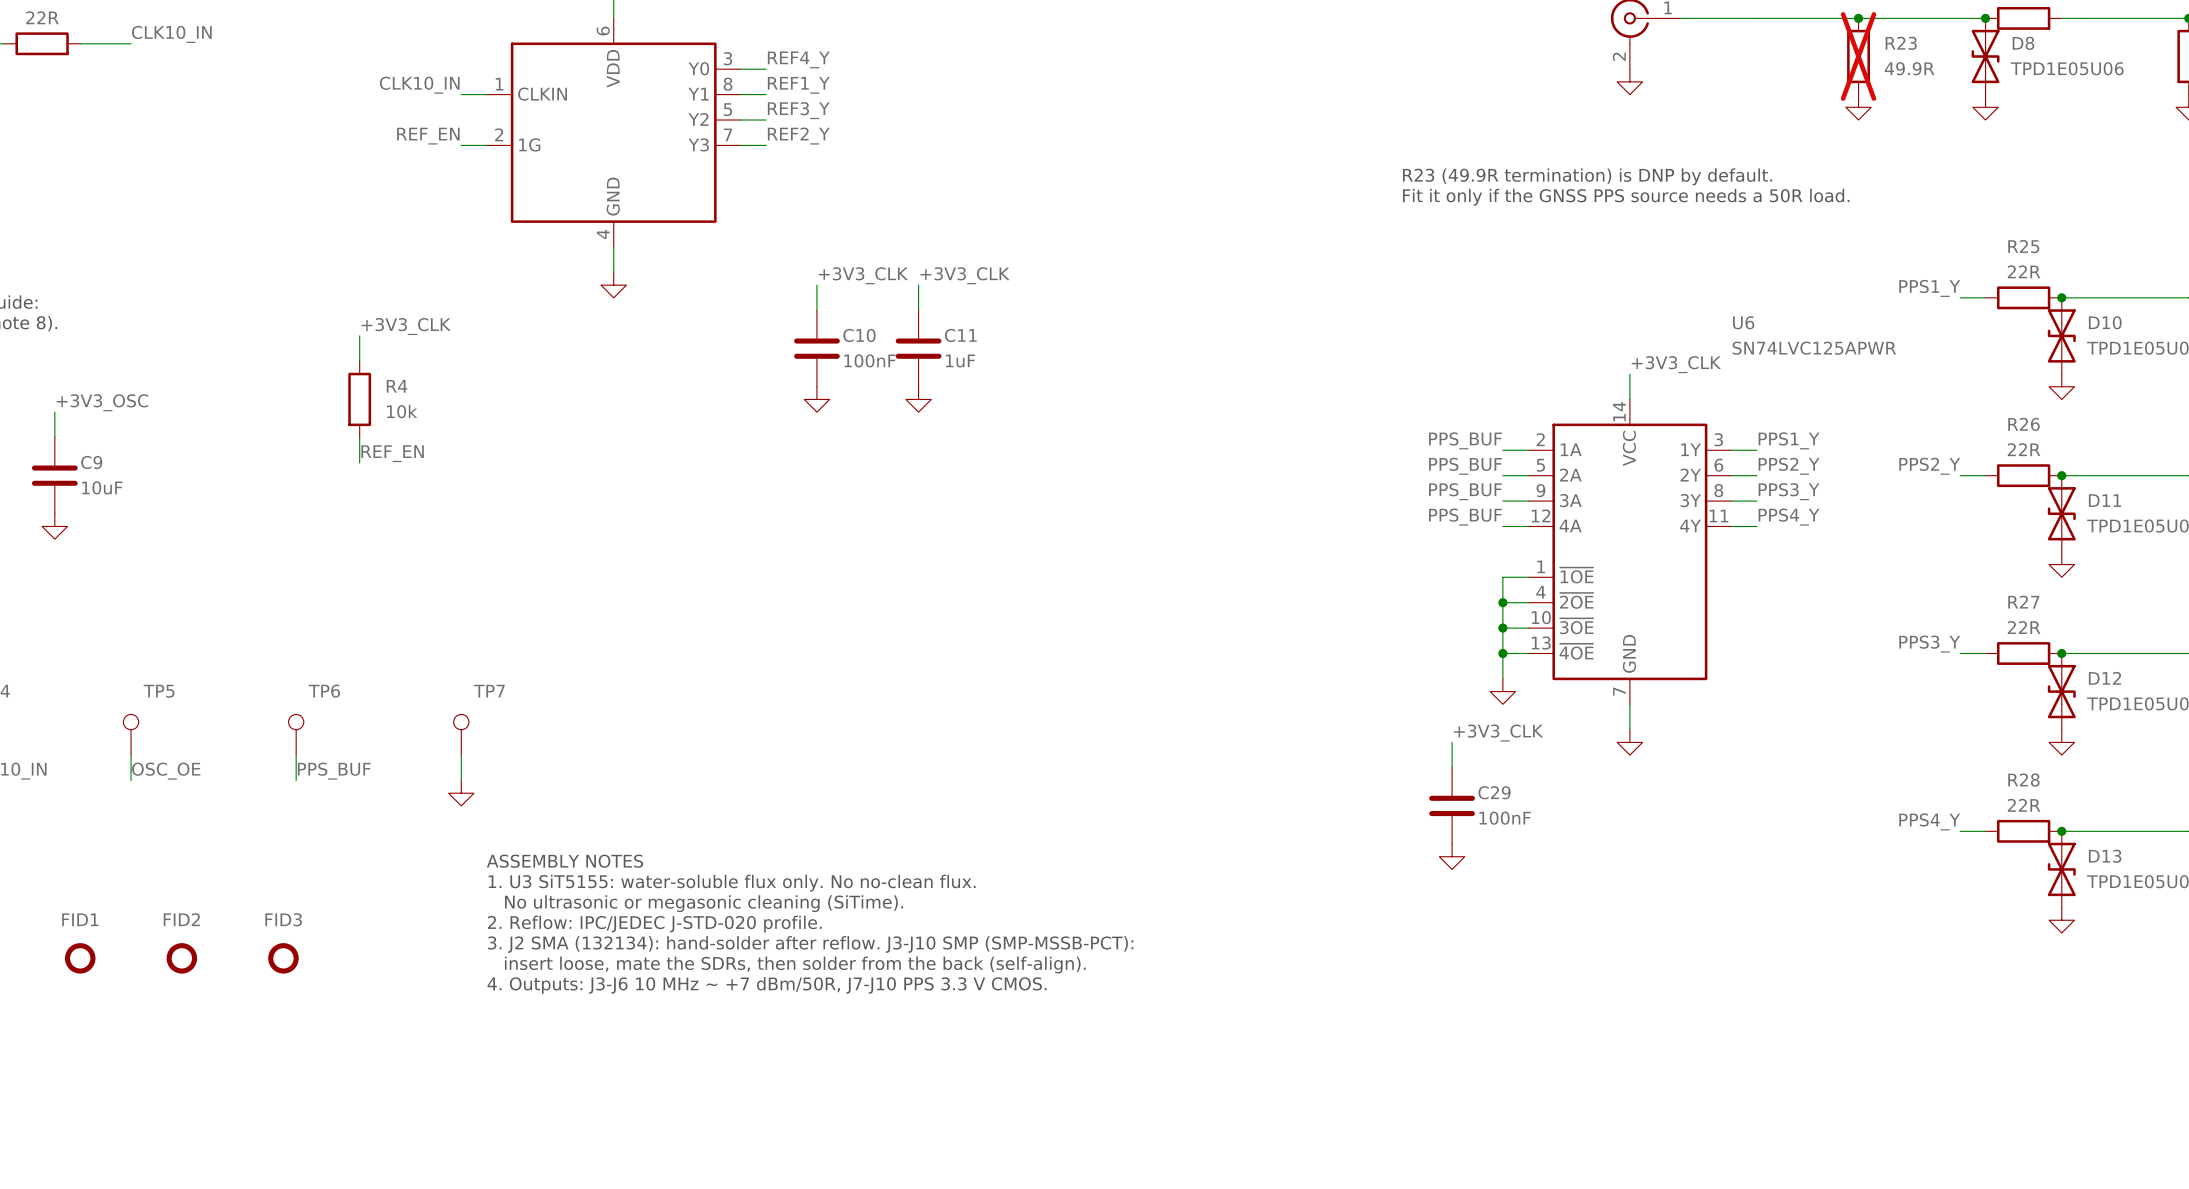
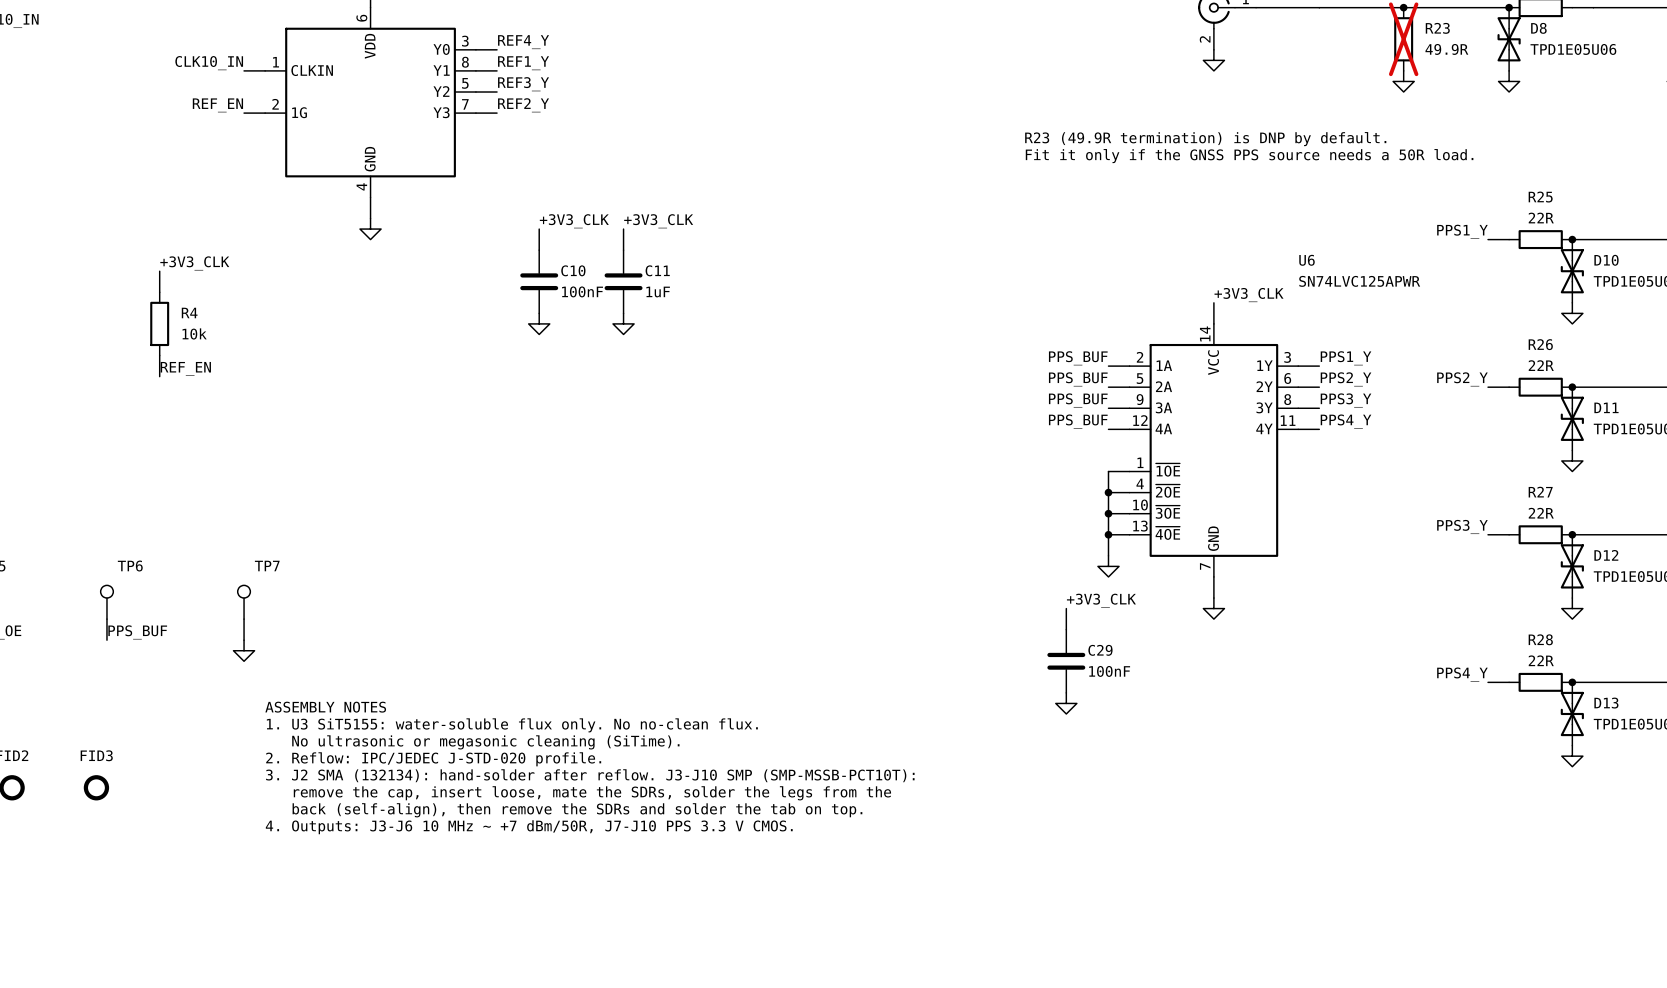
text: 3. J2 SMA (132134): hand-solder after reflow. J3-J10 SMP (SMP-MSSB-PCT): (810, 944) -> 3. J2 SMA (132134): hand-solder after reflow. J3-J10 SMP (SMP-MSSB-PCT10T): (590, 775)
text: insert loose, mate the SDRs, then solder from the back (self-align). (795, 964) -> remove the cap, insert loose, mate the SDRs, solder the legs from the (592, 793)
text: 4. Outputs: J3-J6 10 MHz ~ +7 dBm/50R, J7-J10 PPS 3.3 V CMOS. (767, 985) -> back (self-align), then remove the SDRs and solder the tab on top. (577, 810)
text: none -> 4. Outputs: J3-J6 10 MHz ~ +7 dBm/50R, J7-J10 PPS 3.3 V CMOS. (529, 827)

